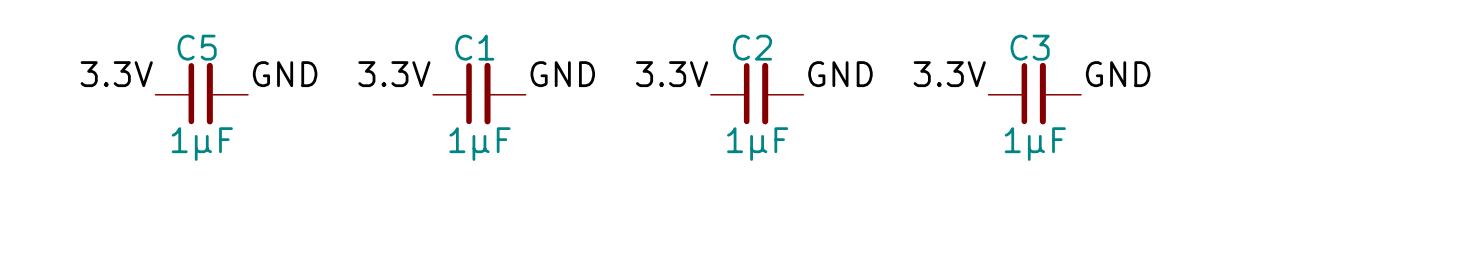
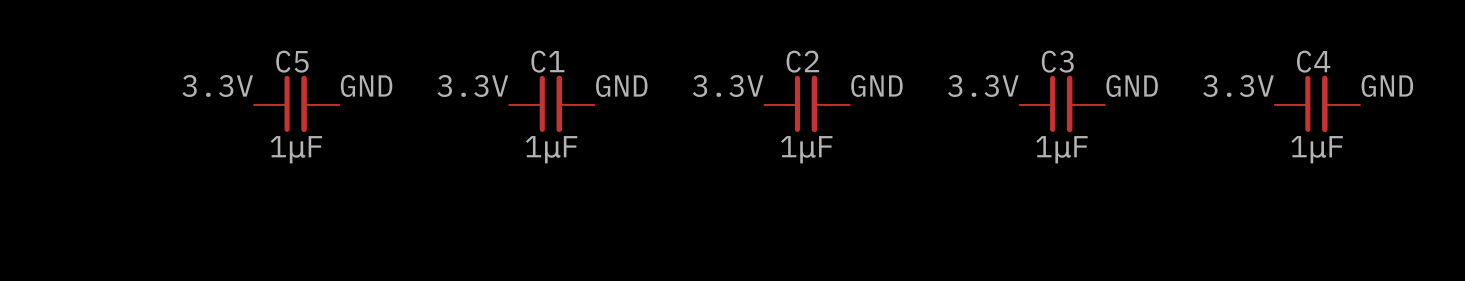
label: none -> 3.3V (1238, 85)
label: none -> GND (1387, 85)
C4: none -> 1μF (1317, 103)

